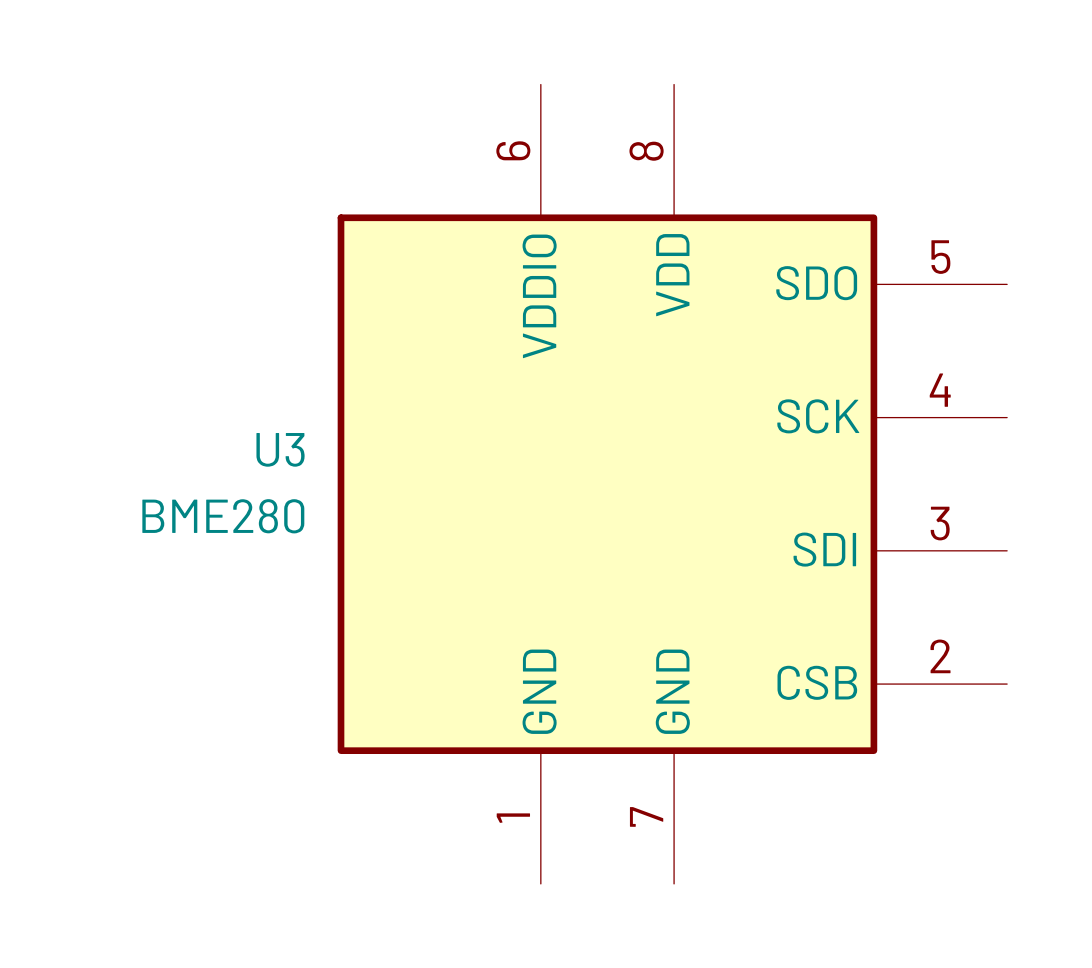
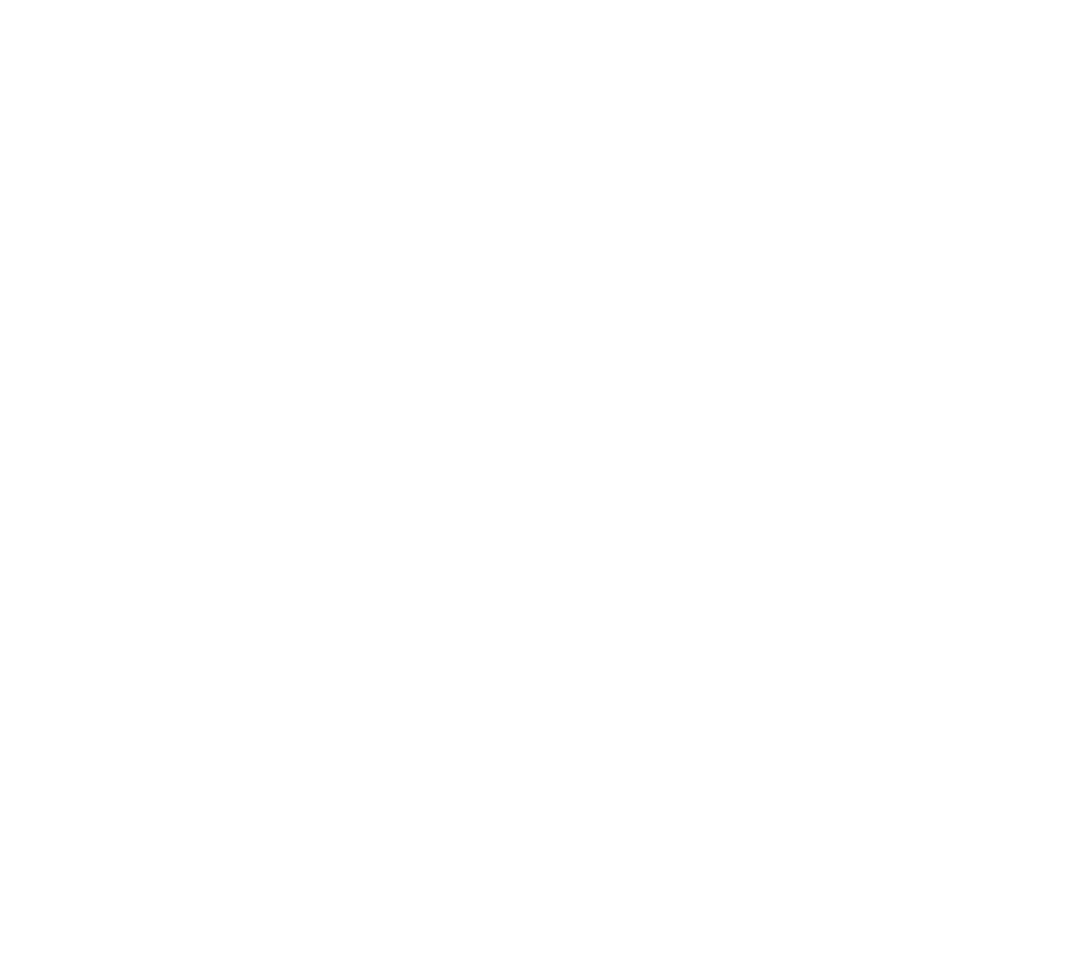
U3: BME280 (672, 484) -> none

